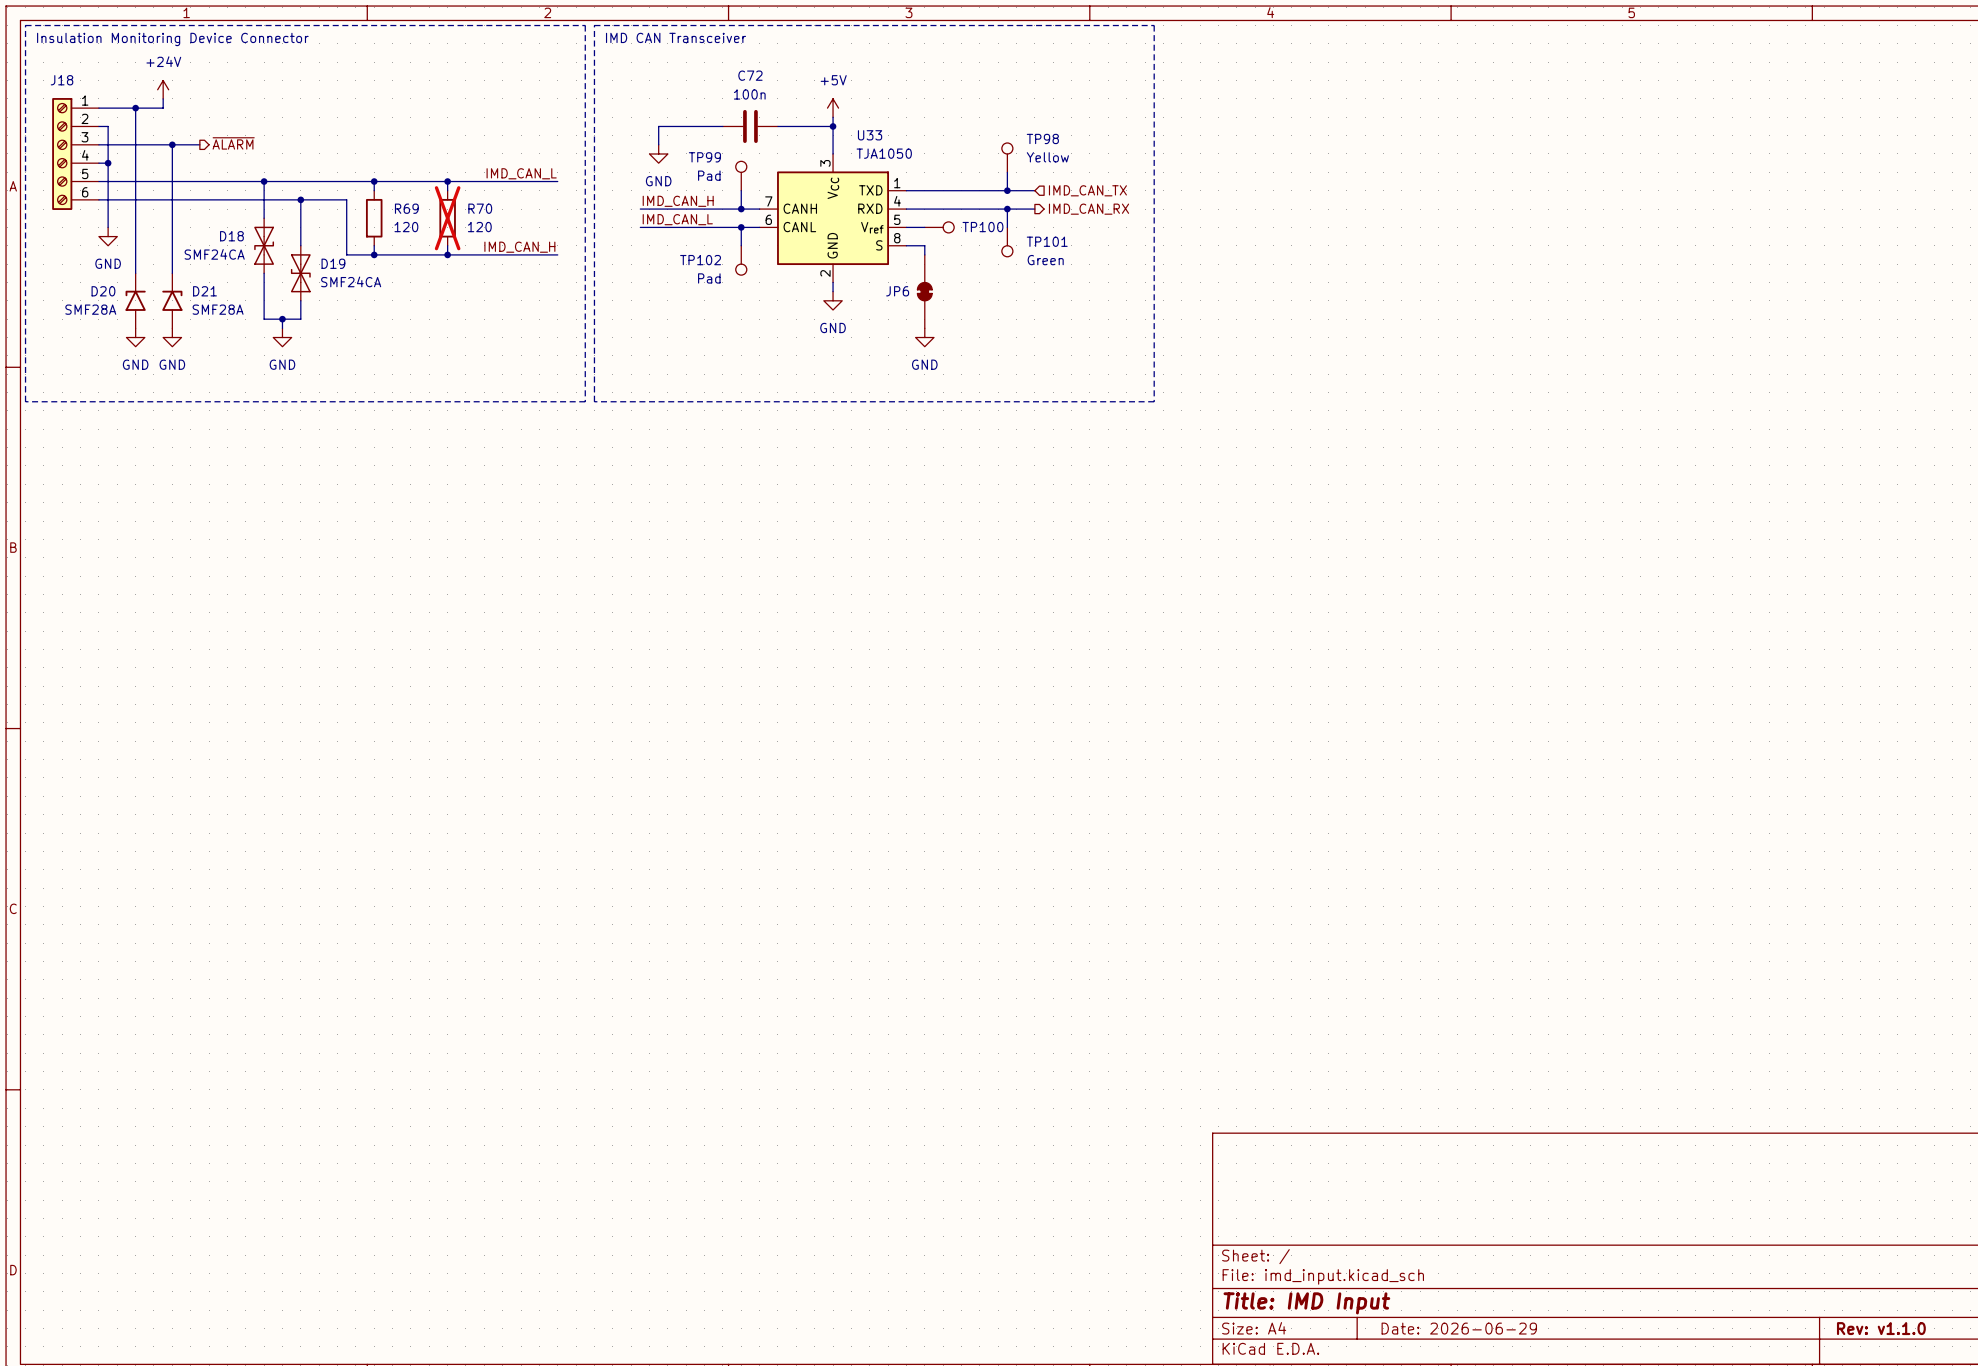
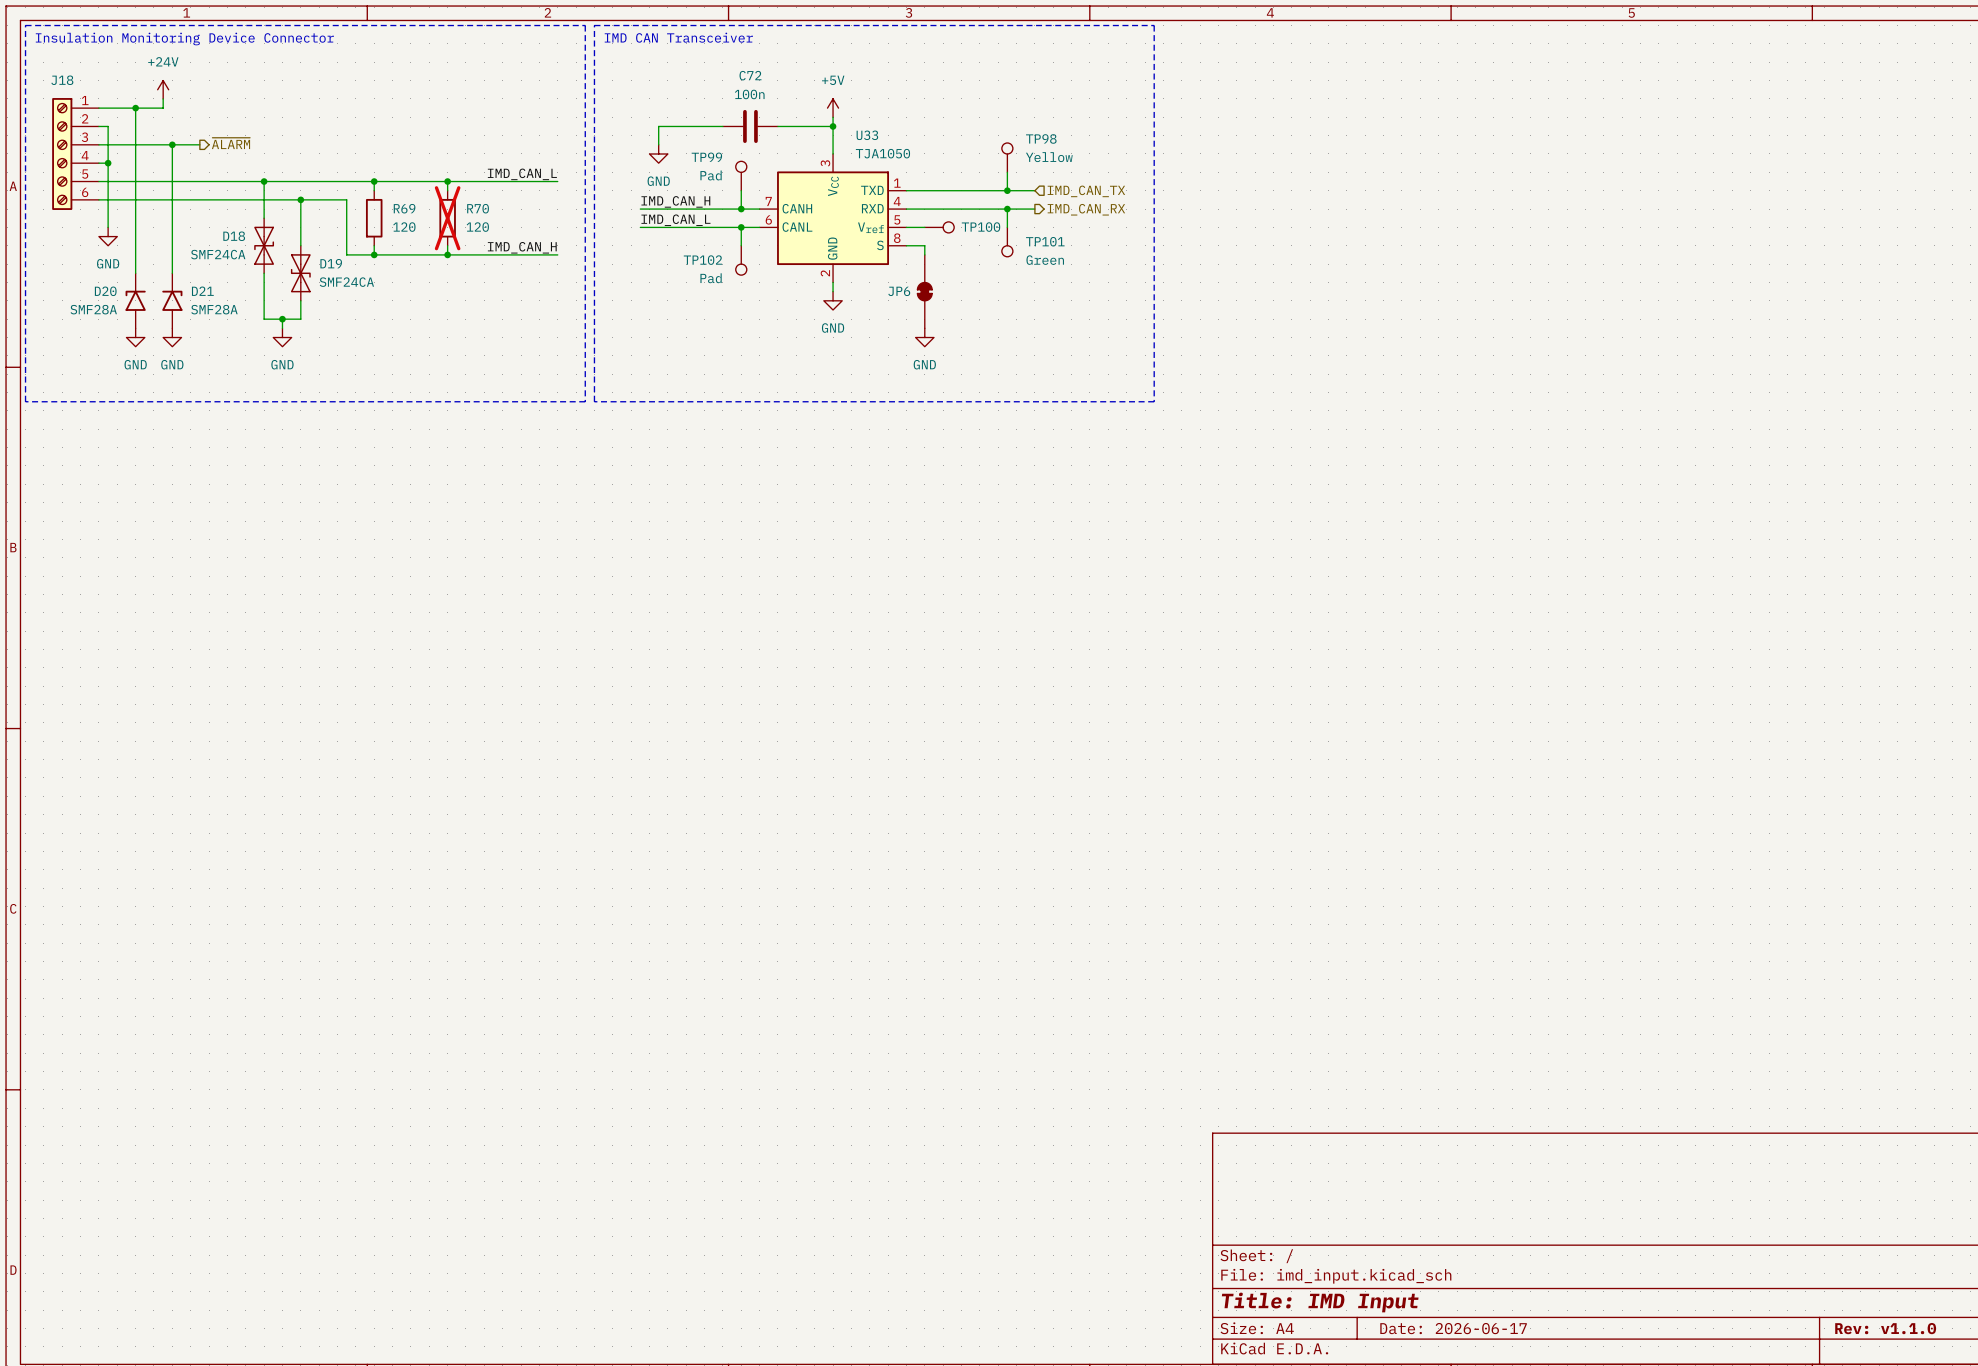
title block: Date: 2026-06-29 (1459, 1328) -> Date: 2026-06-17 (1453, 1328)

